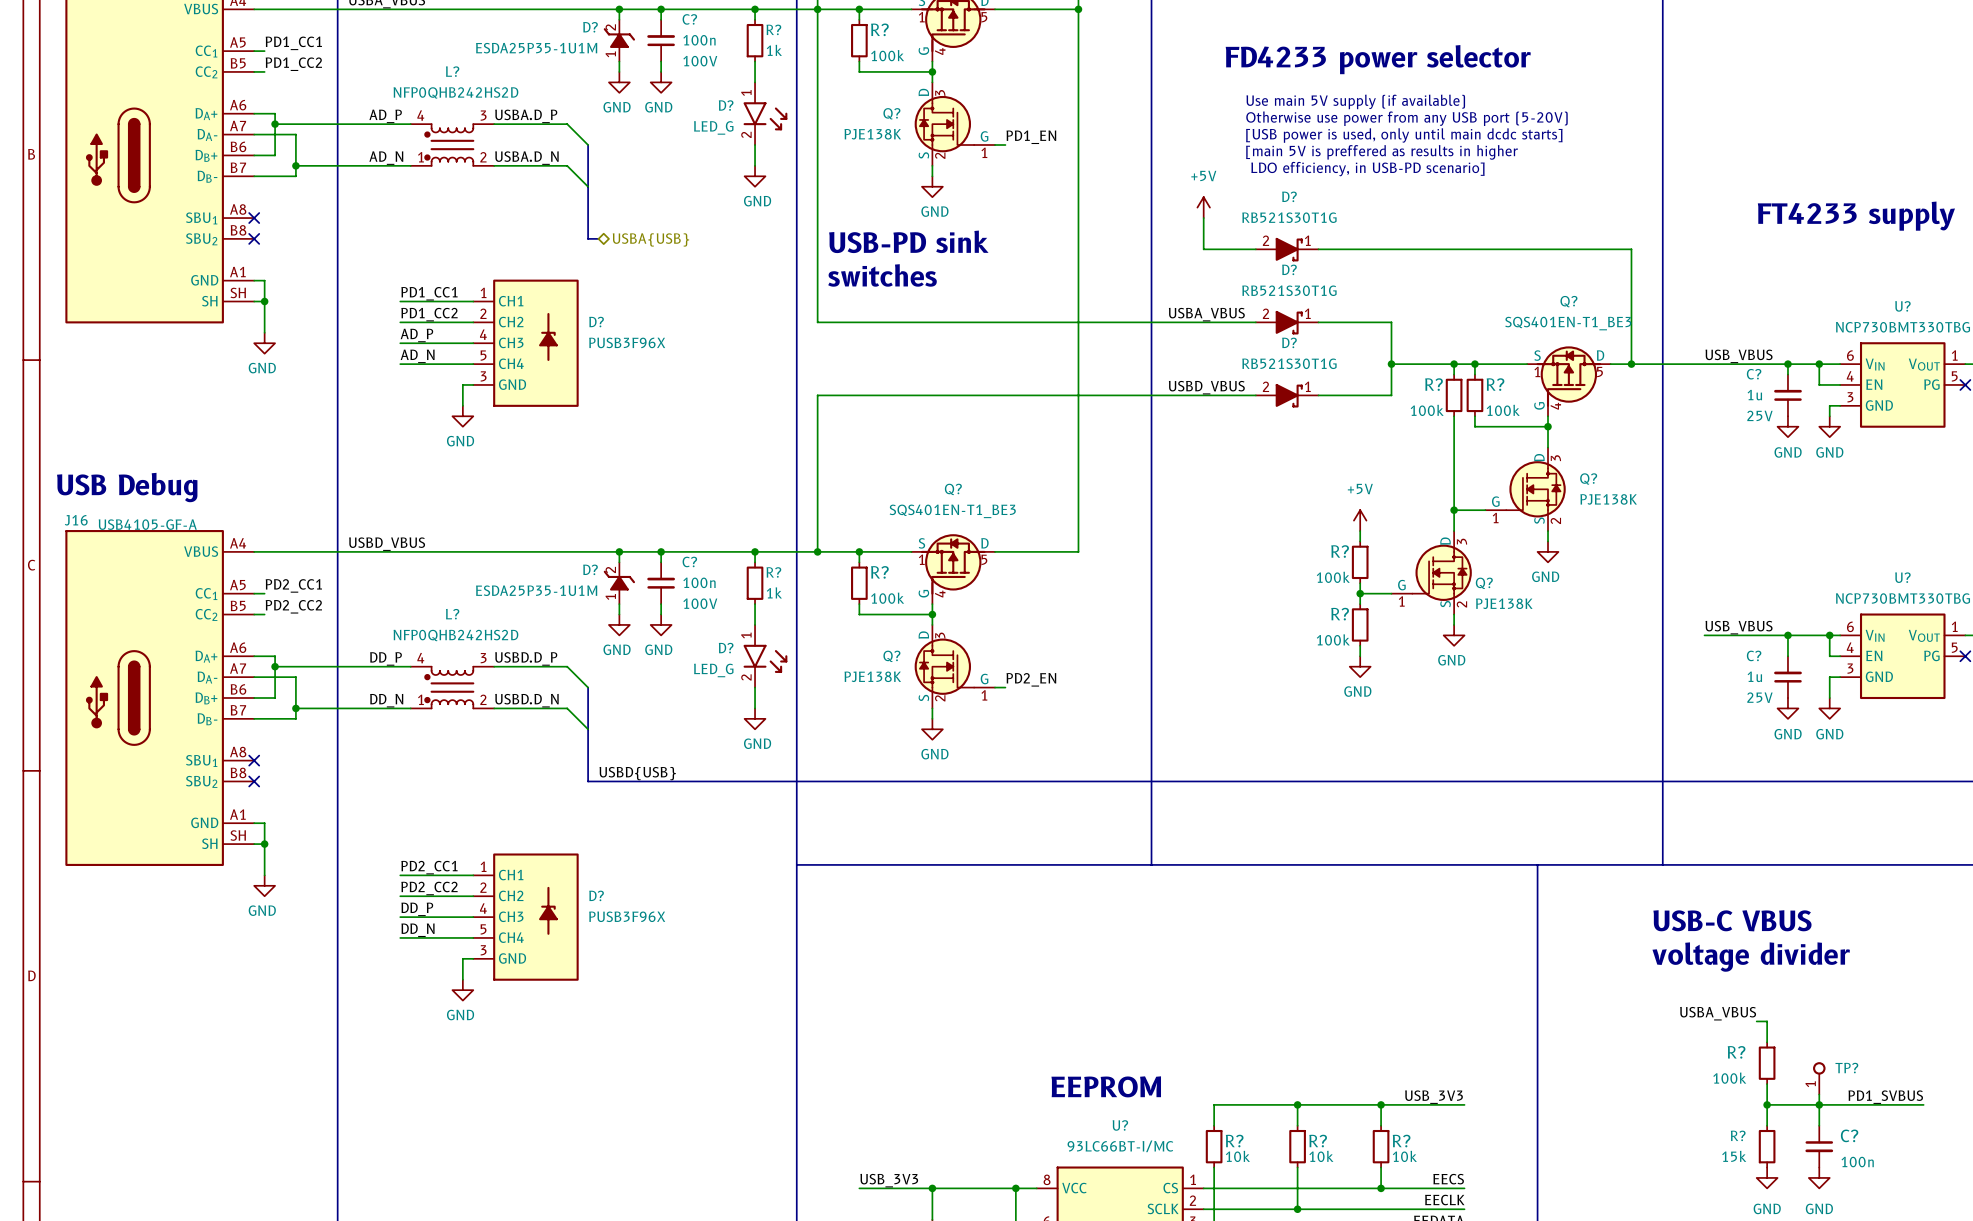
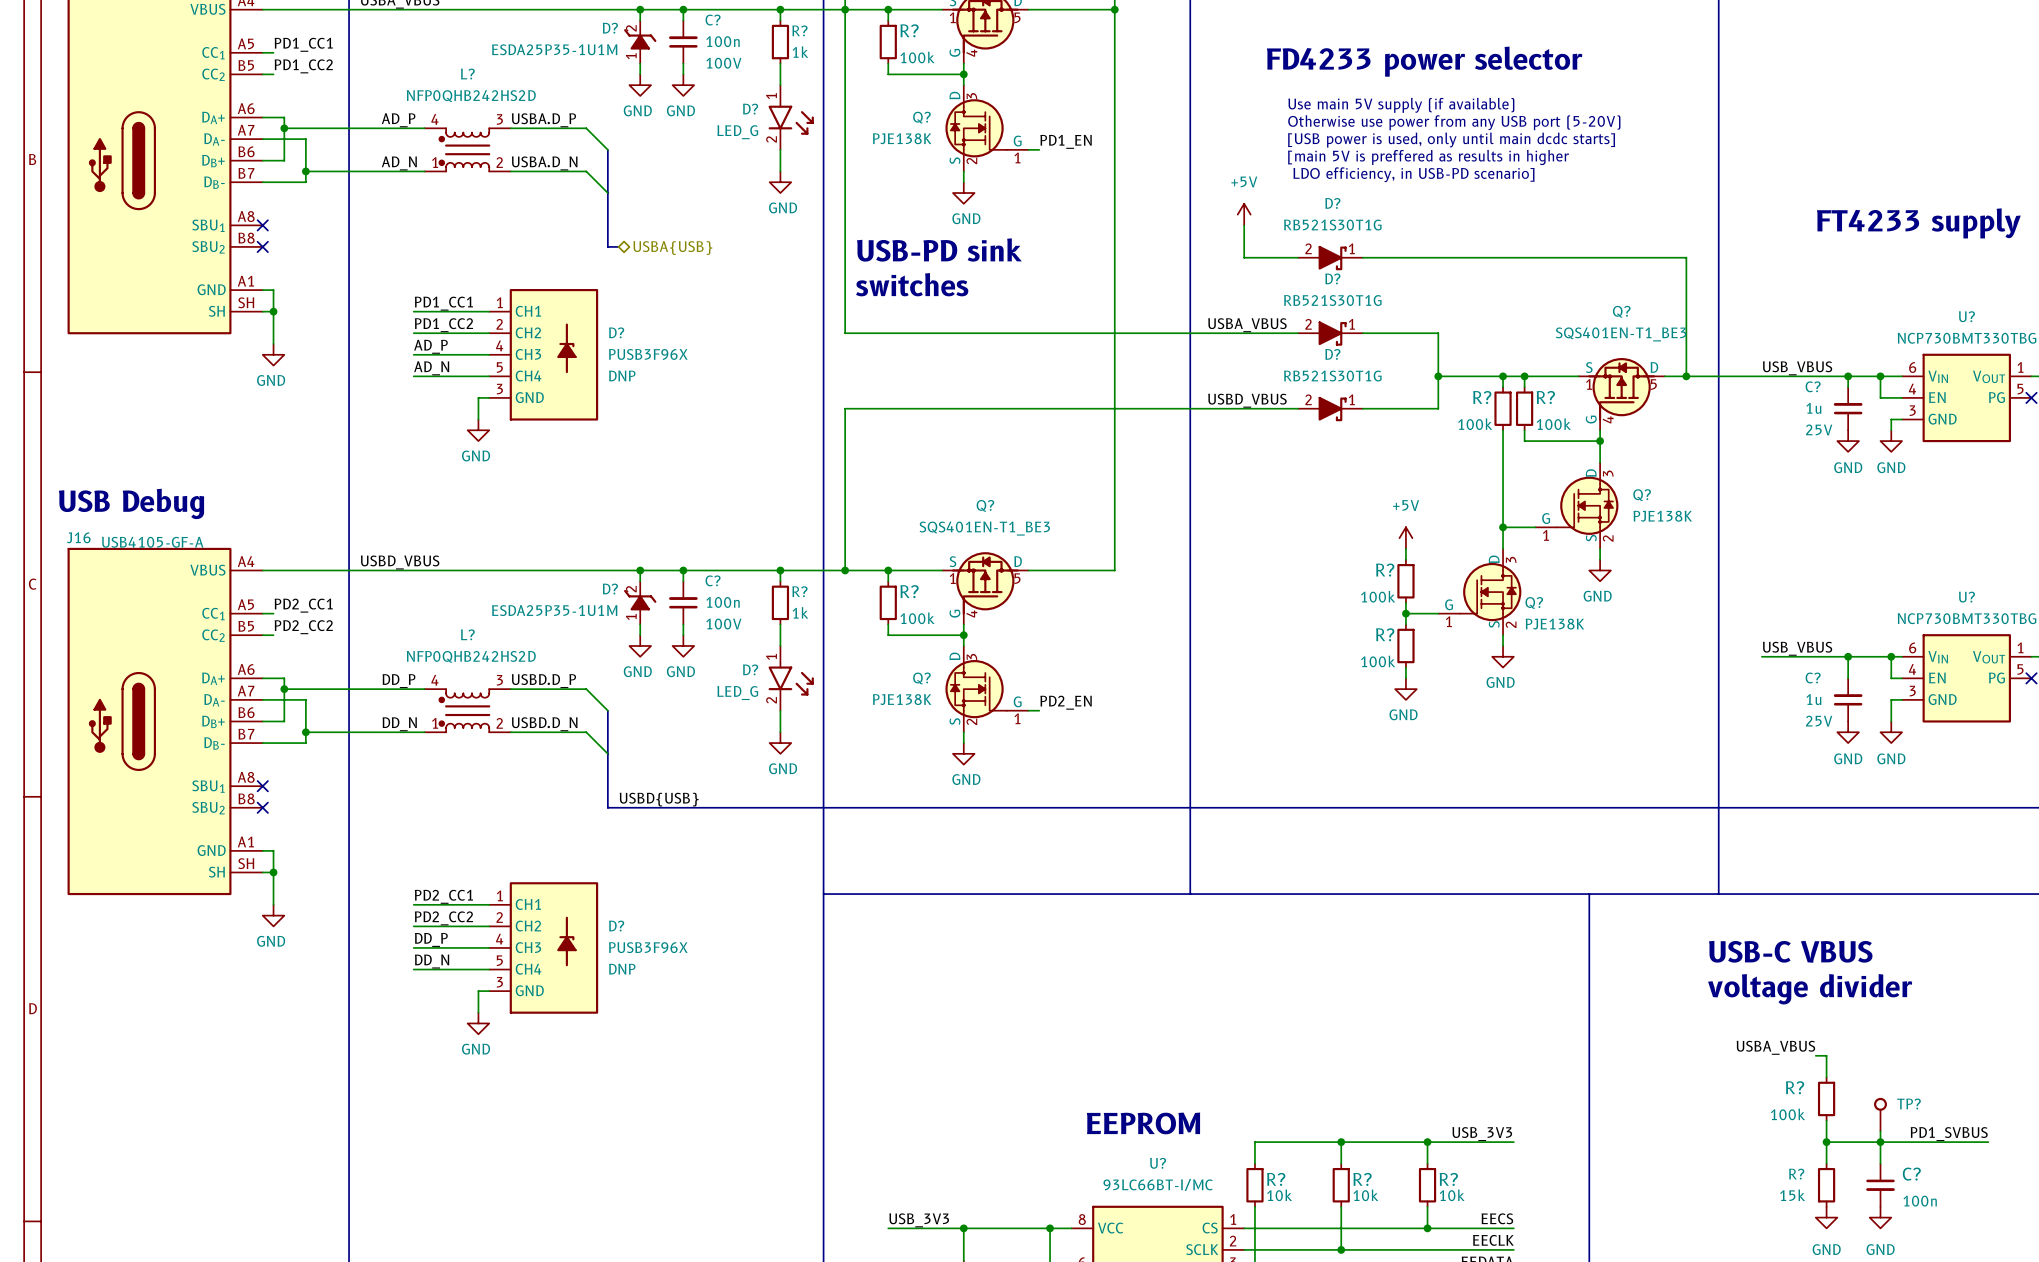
D? text: none -> DNP (622, 375)
D? text: none -> DNP (622, 969)
TP? pin number: 1 (1810, 1084) -> none

